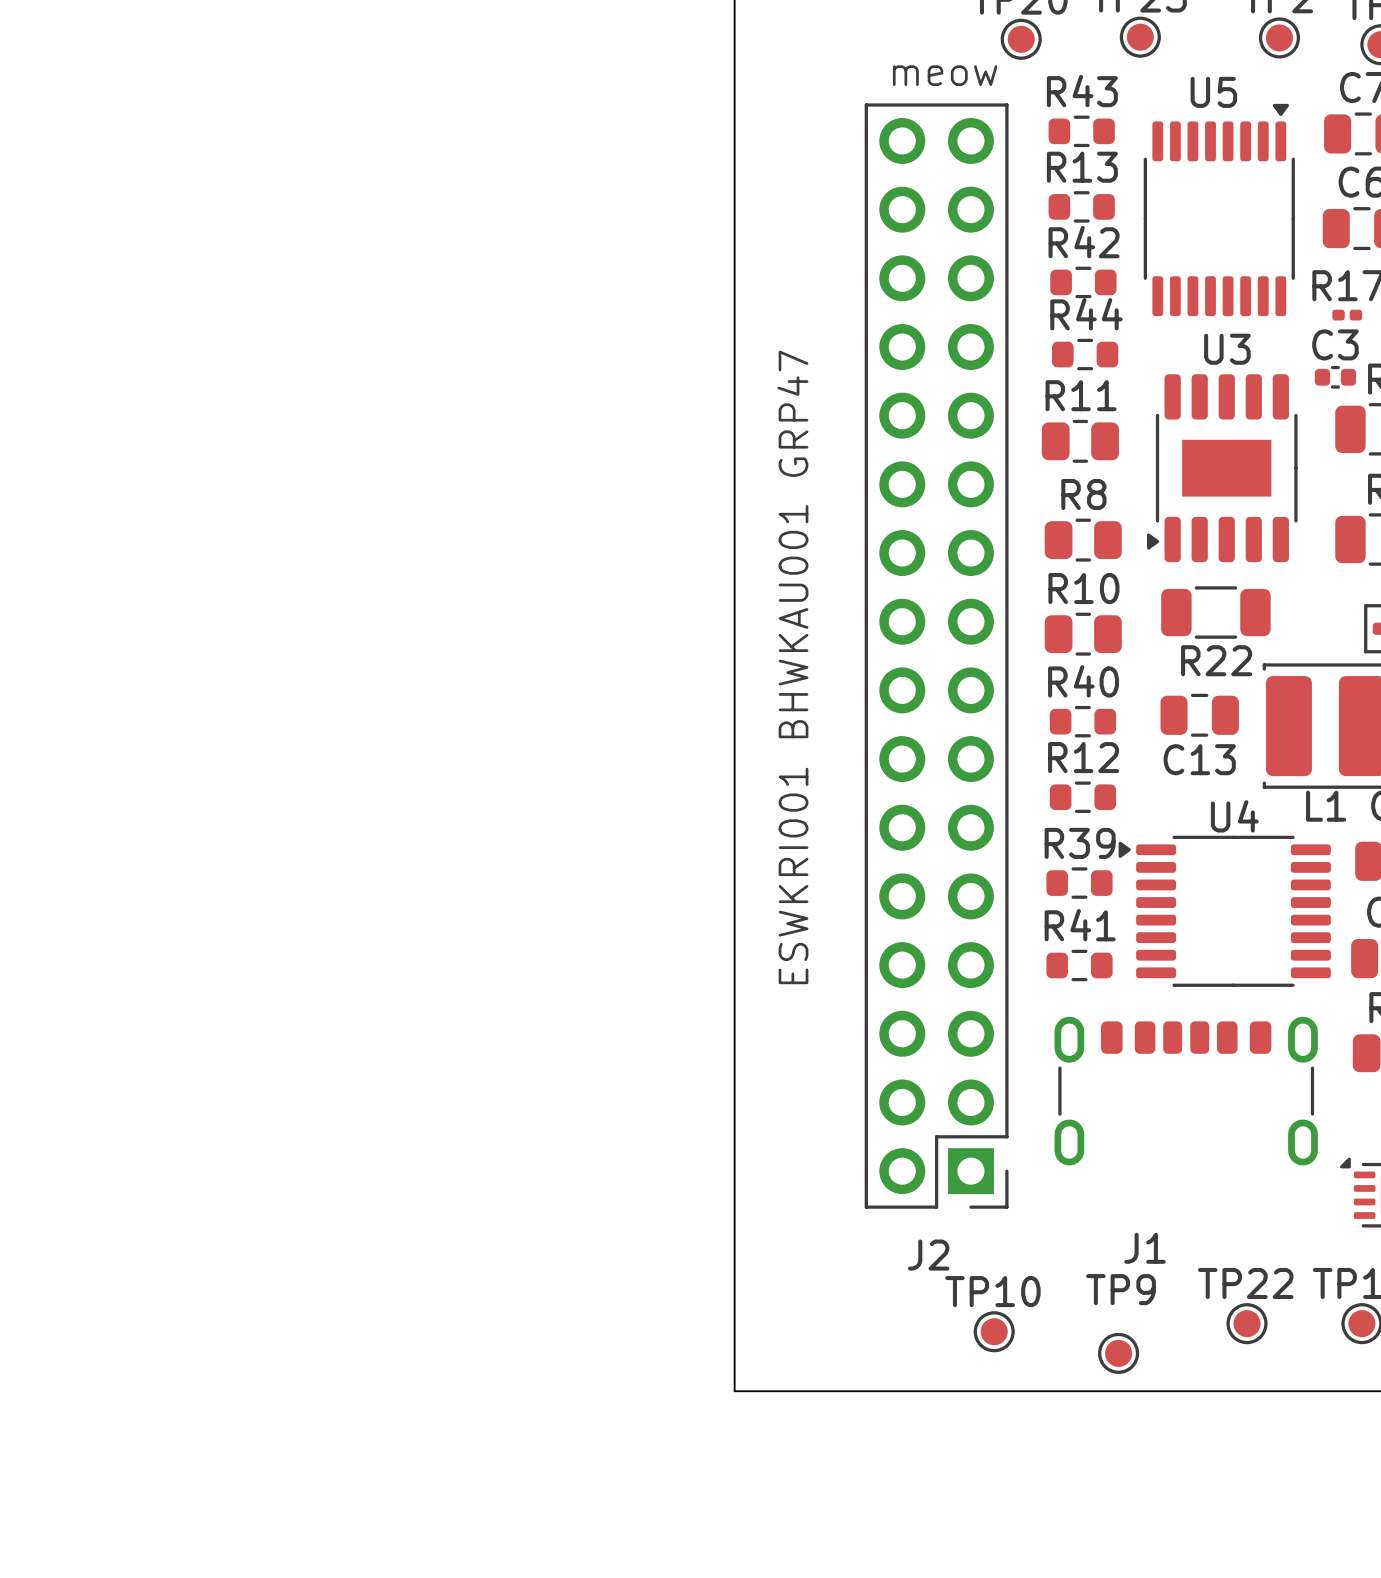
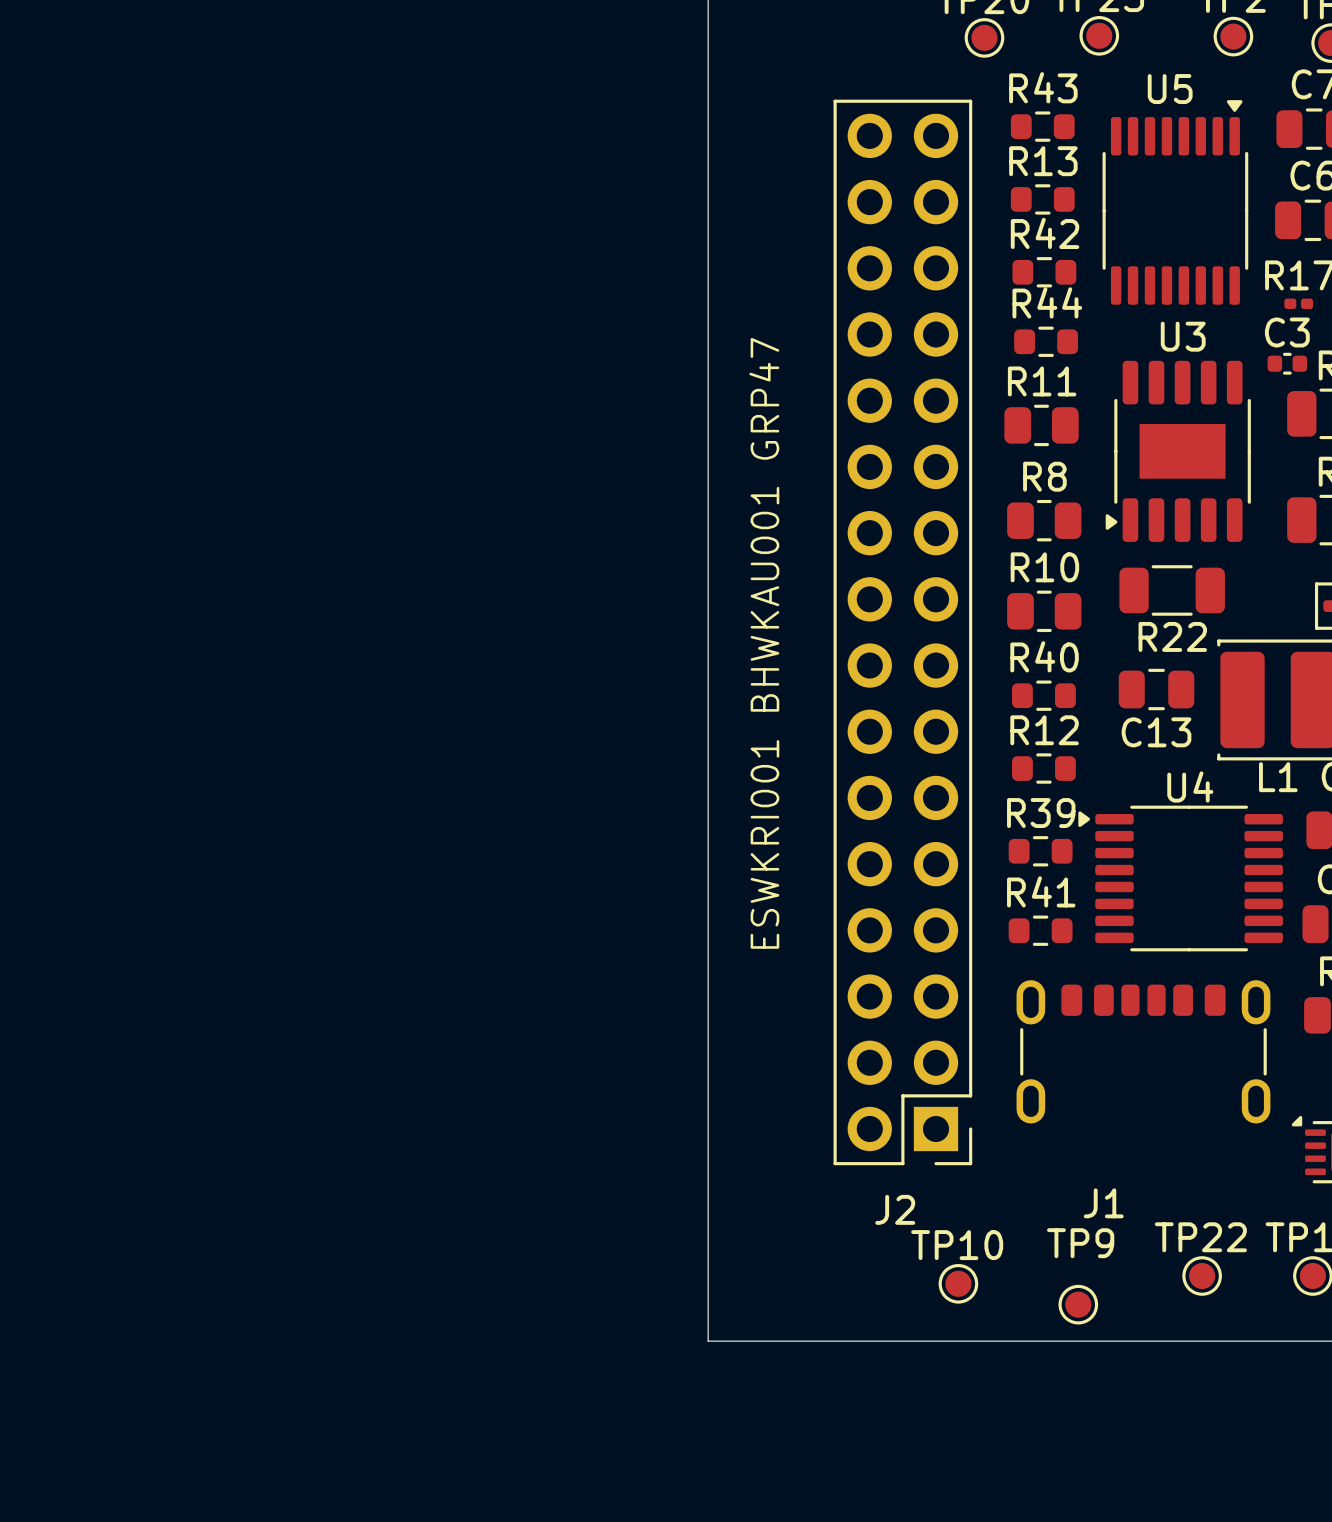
text: meow (945, 75) -> none

